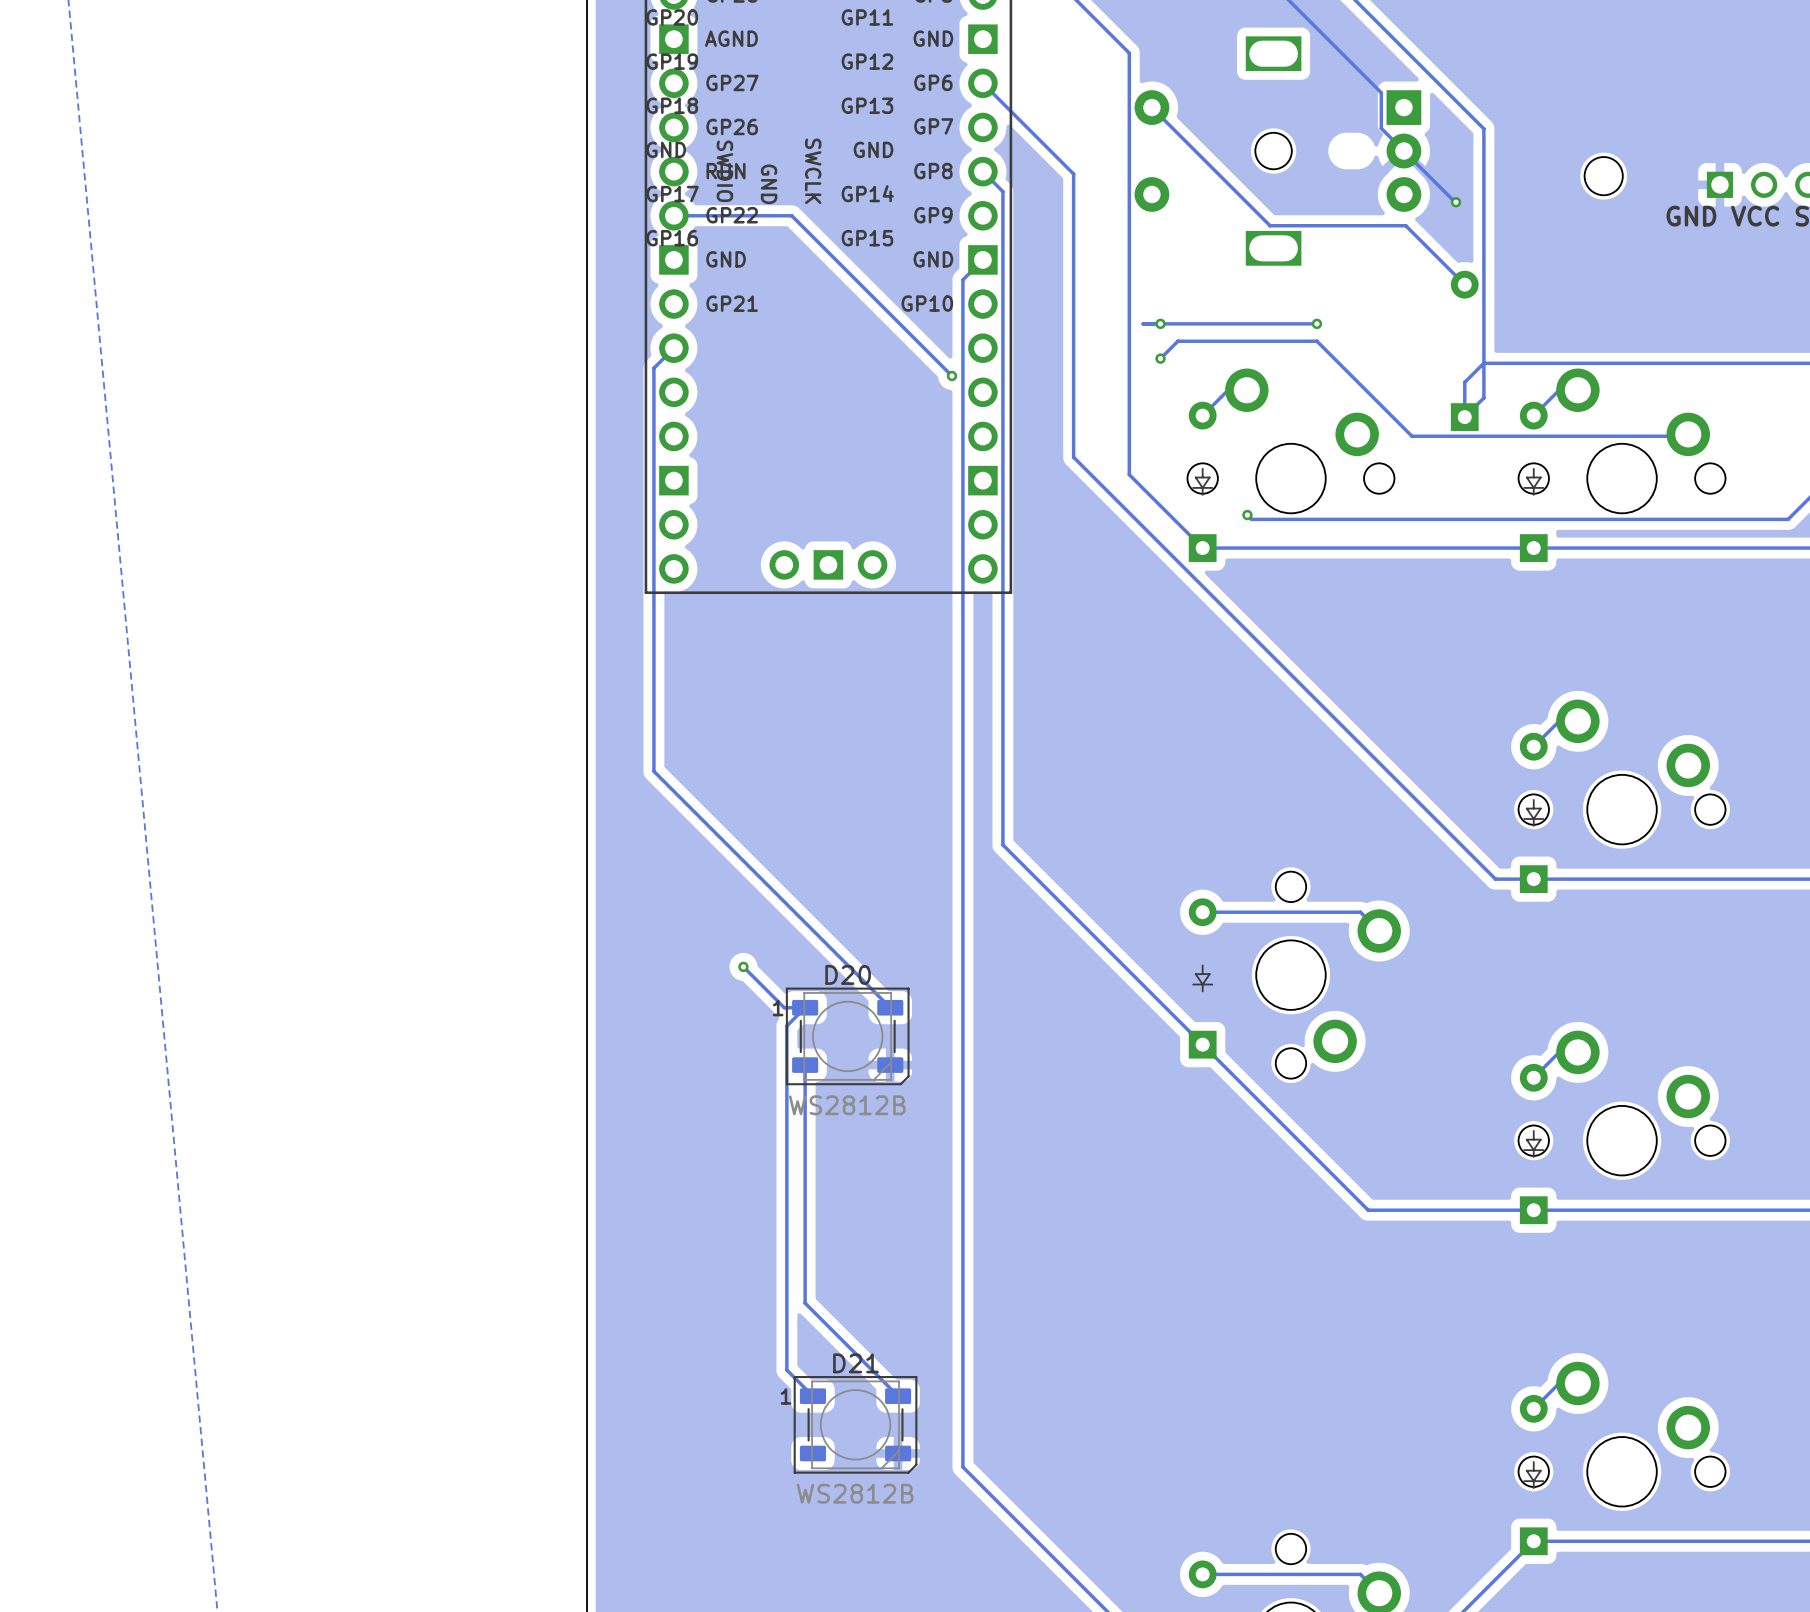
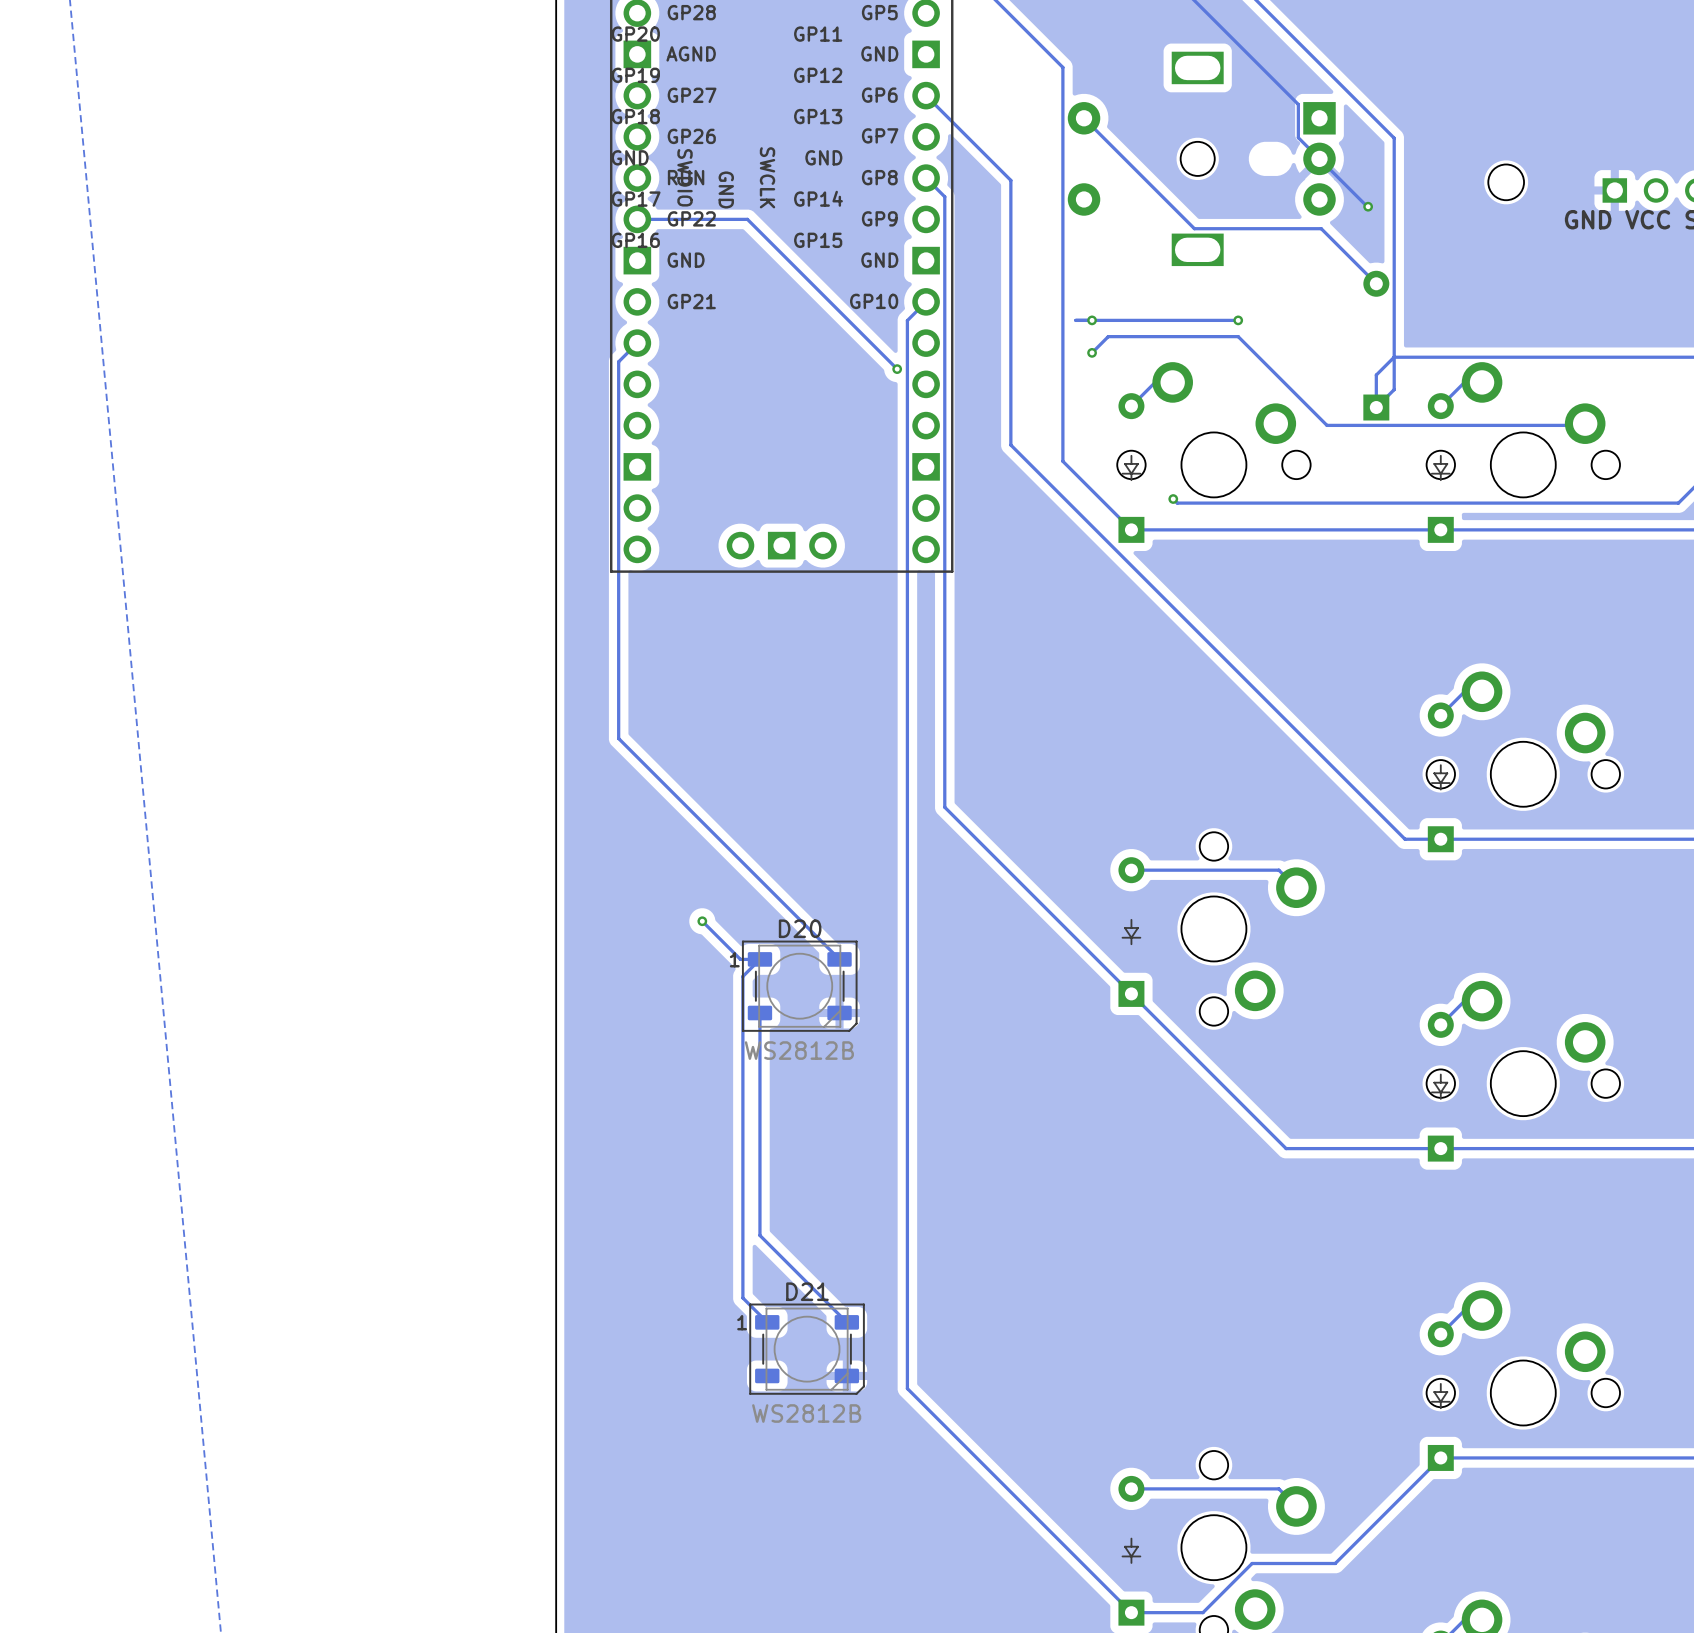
track: (982, 259) (962, 279) (962, 324) -> (926, 301) (907, 320)

